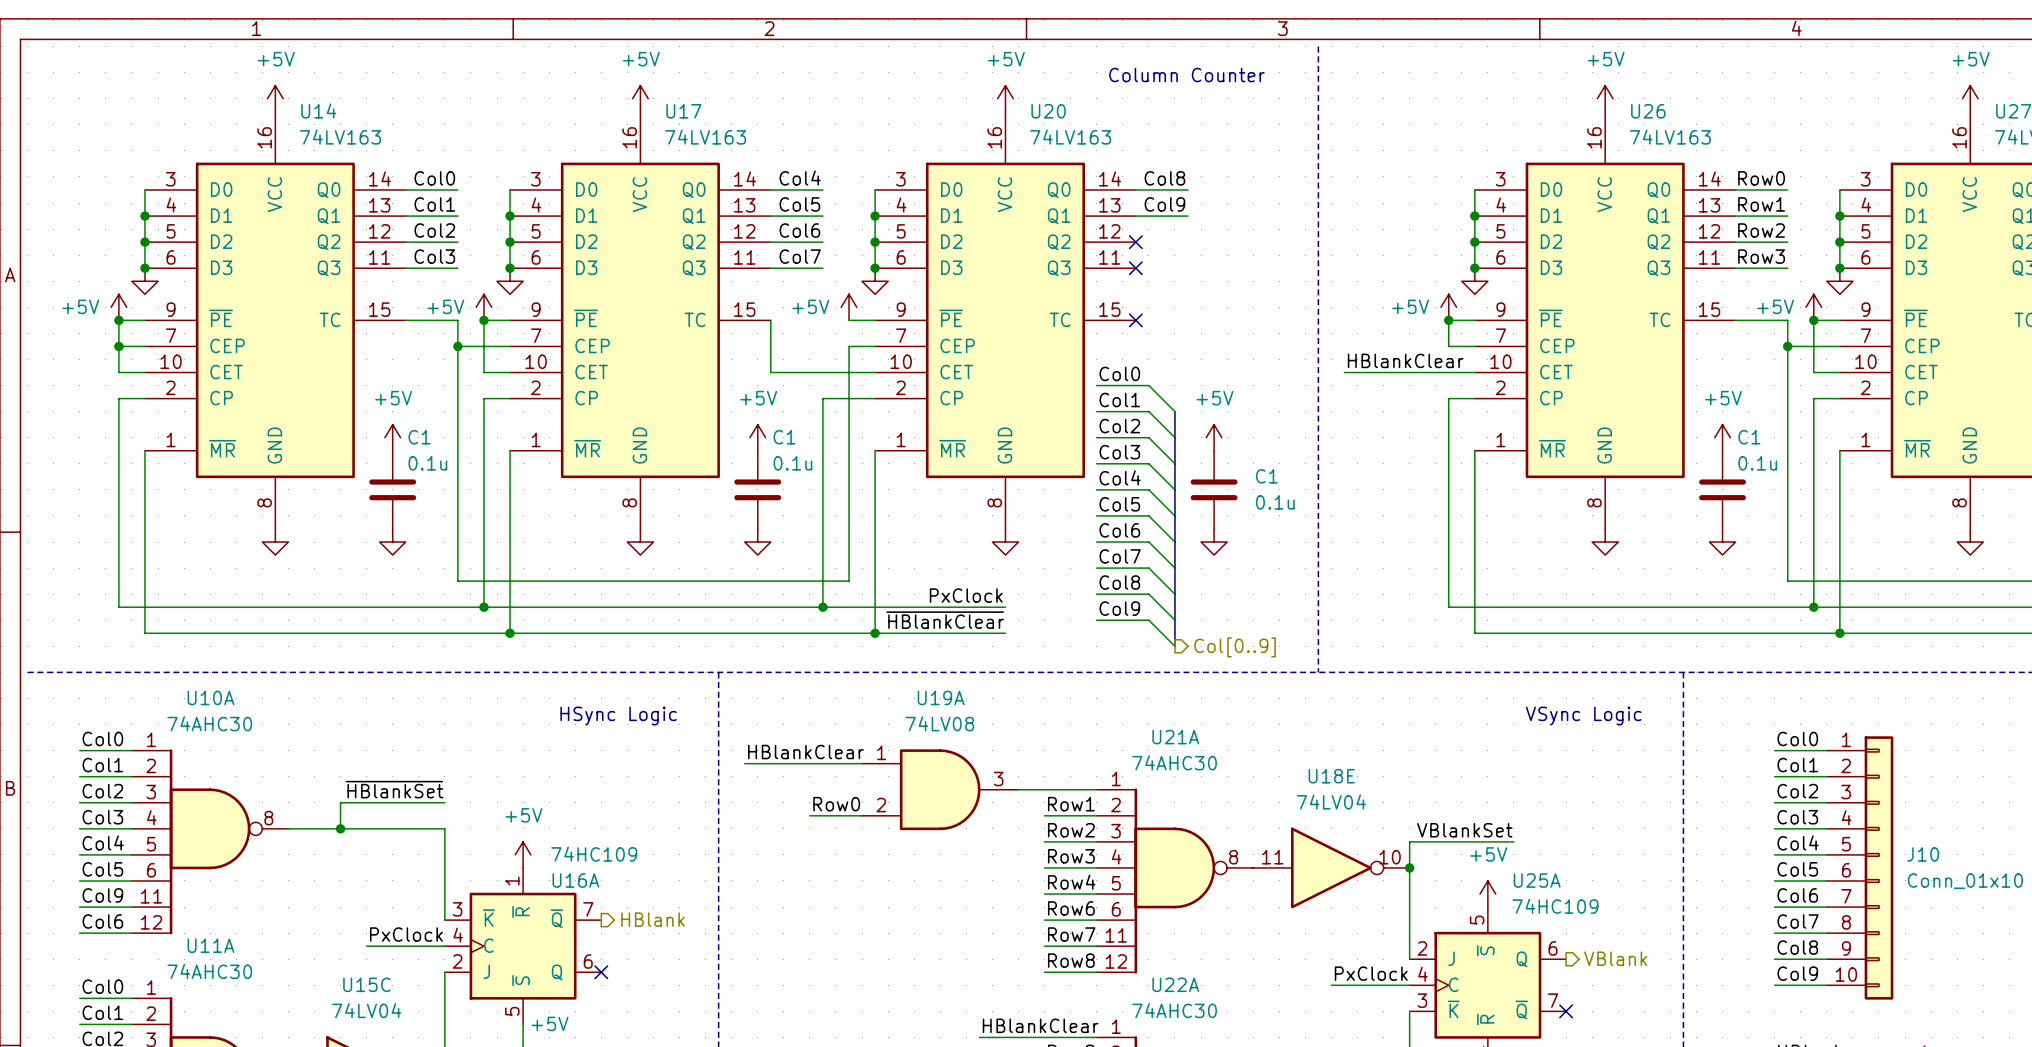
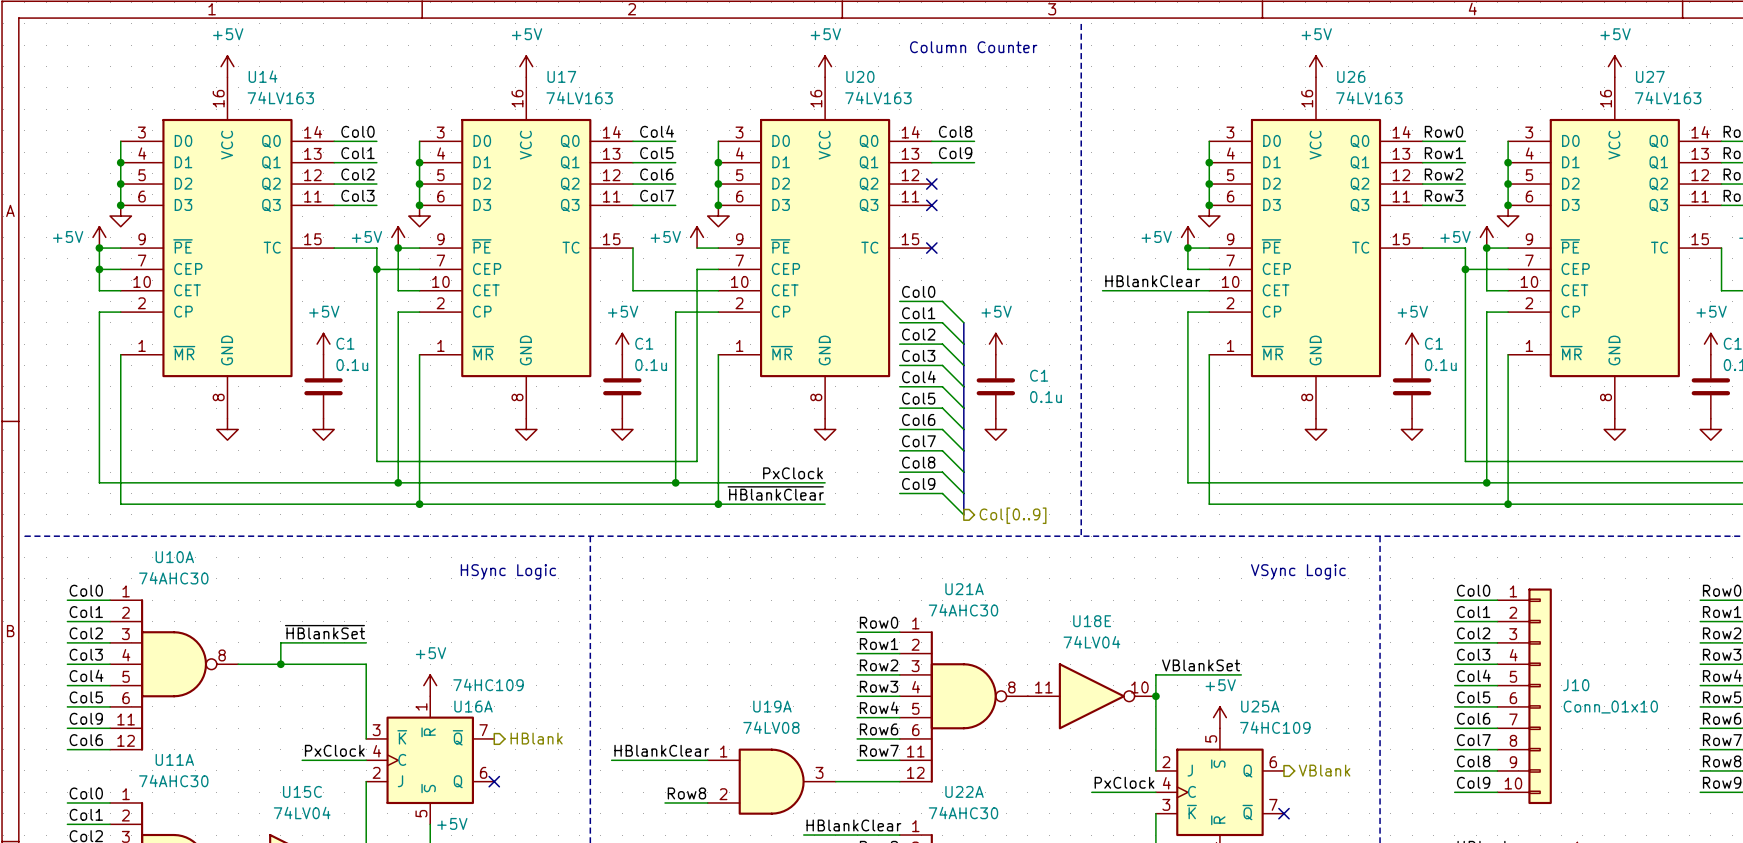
label position: HBlankClear (805, 752) -> HBlankClear (661, 750)
wire: (744, 763) (862, 763) -> (611, 760) (707, 760)
U19A position: (940, 789) -> (771, 781)
wire: (1018, 789) (1044, 789) -> (835, 781) (857, 781)
label position: Row0 (836, 804) -> Row0 (879, 622)
wire: (809, 815) (862, 815) -> (665, 802) (707, 802)
label position: Row8 (1071, 960) -> Row8 (686, 793)

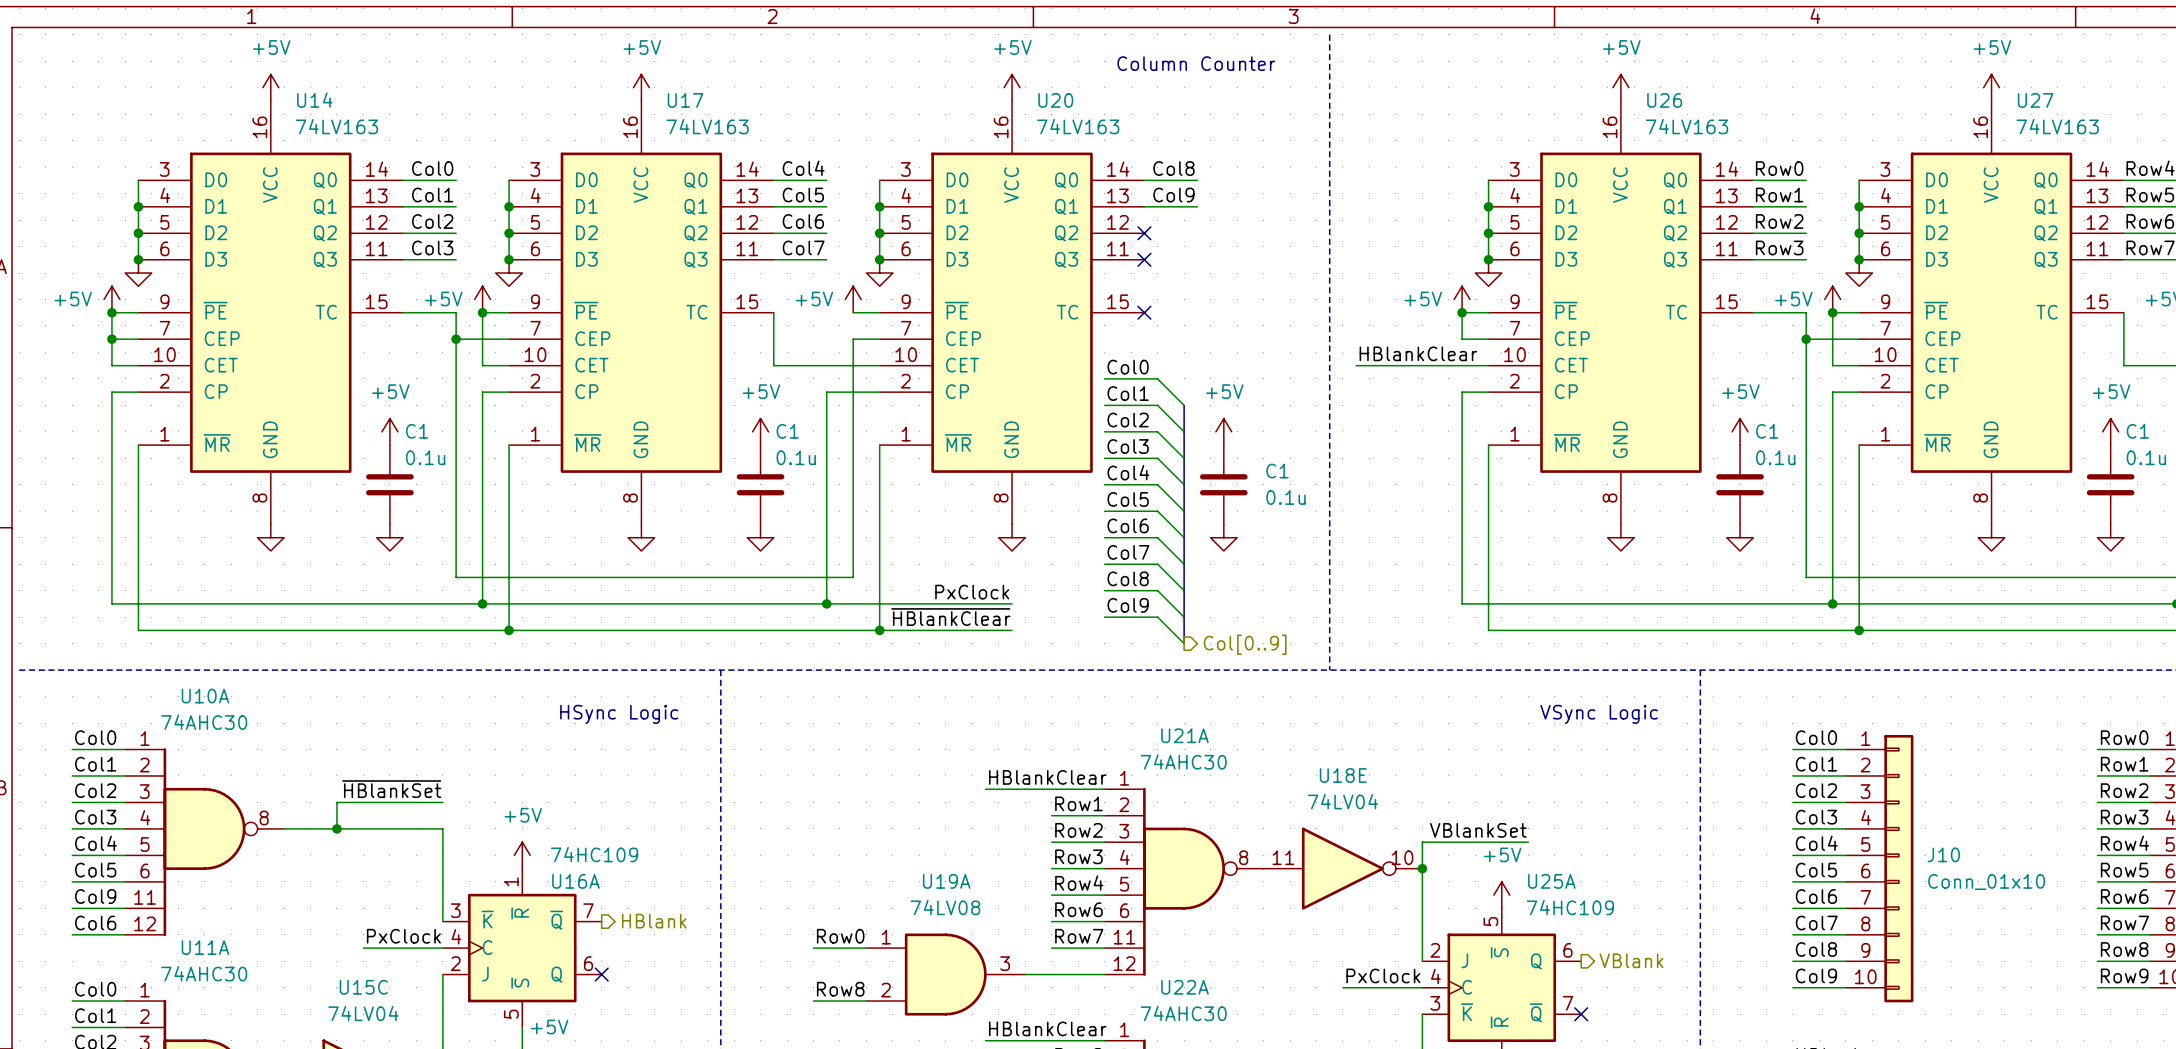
label: none -> HBlankClear (1047, 777)
label: Row0 (879, 622) -> none
wire: none -> (985, 789) (1051, 789)
label: HBlankClear (661, 750) -> none
label: none -> Row0 (840, 936)
wire: (611, 760) (665, 760) -> none

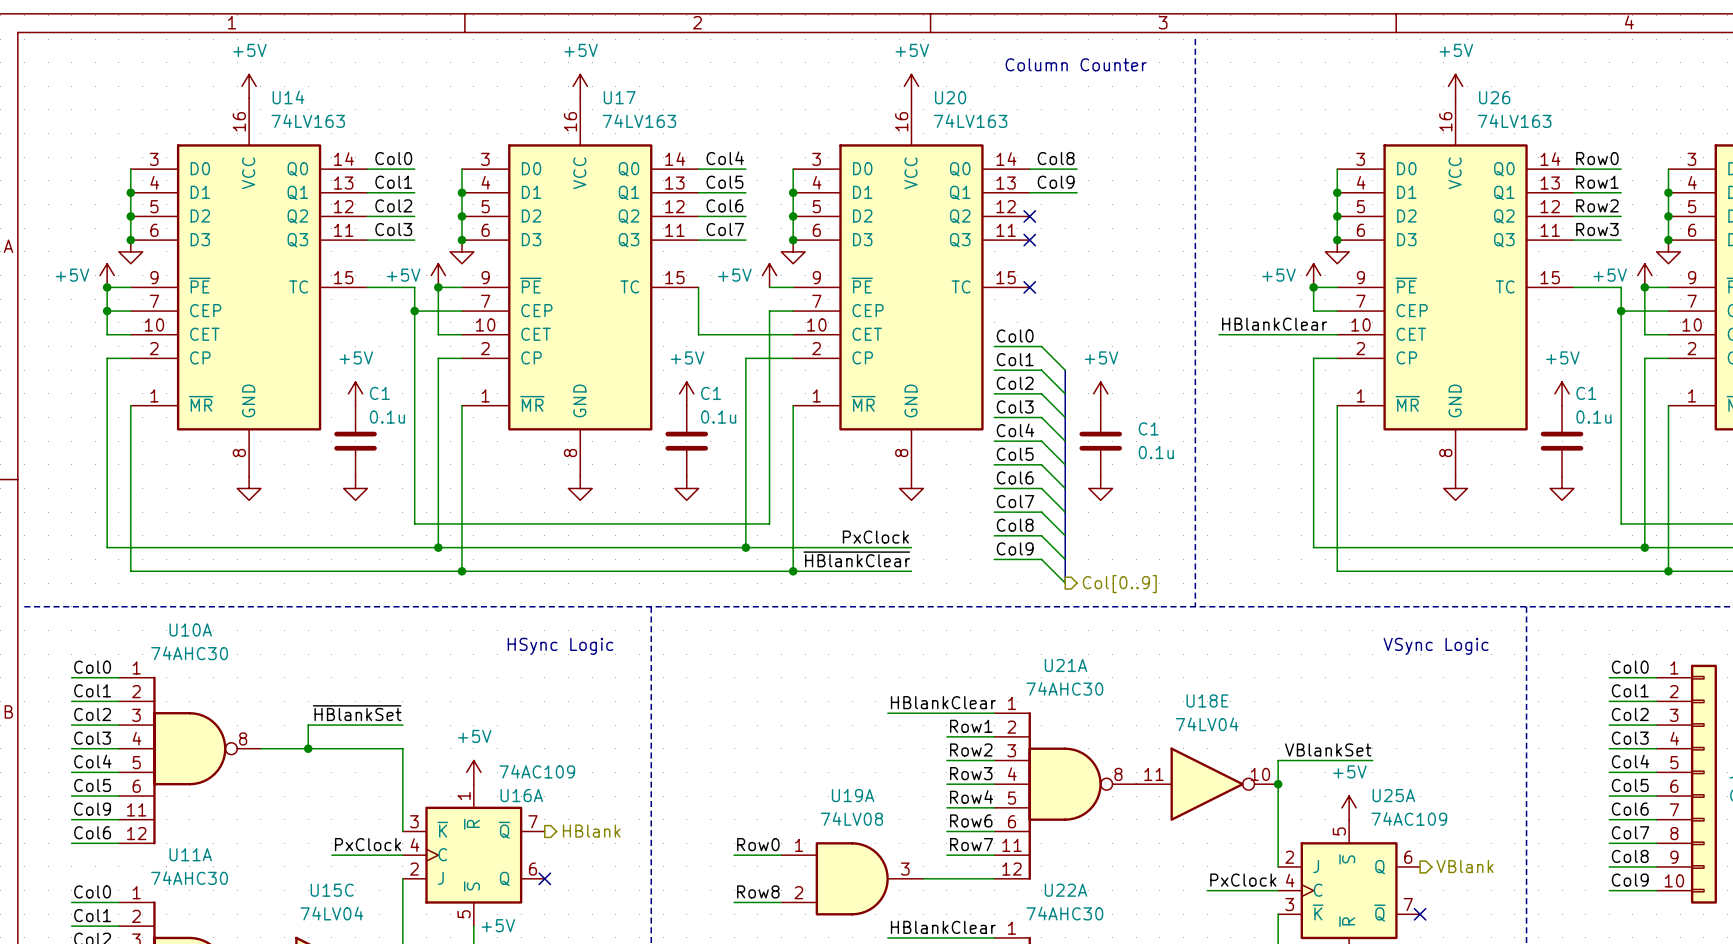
U16A value: 74HC109 (594, 854) -> 74AC109 (537, 771)
U25A value: 74HC109 (1570, 907) -> 74AC109 (1409, 818)

